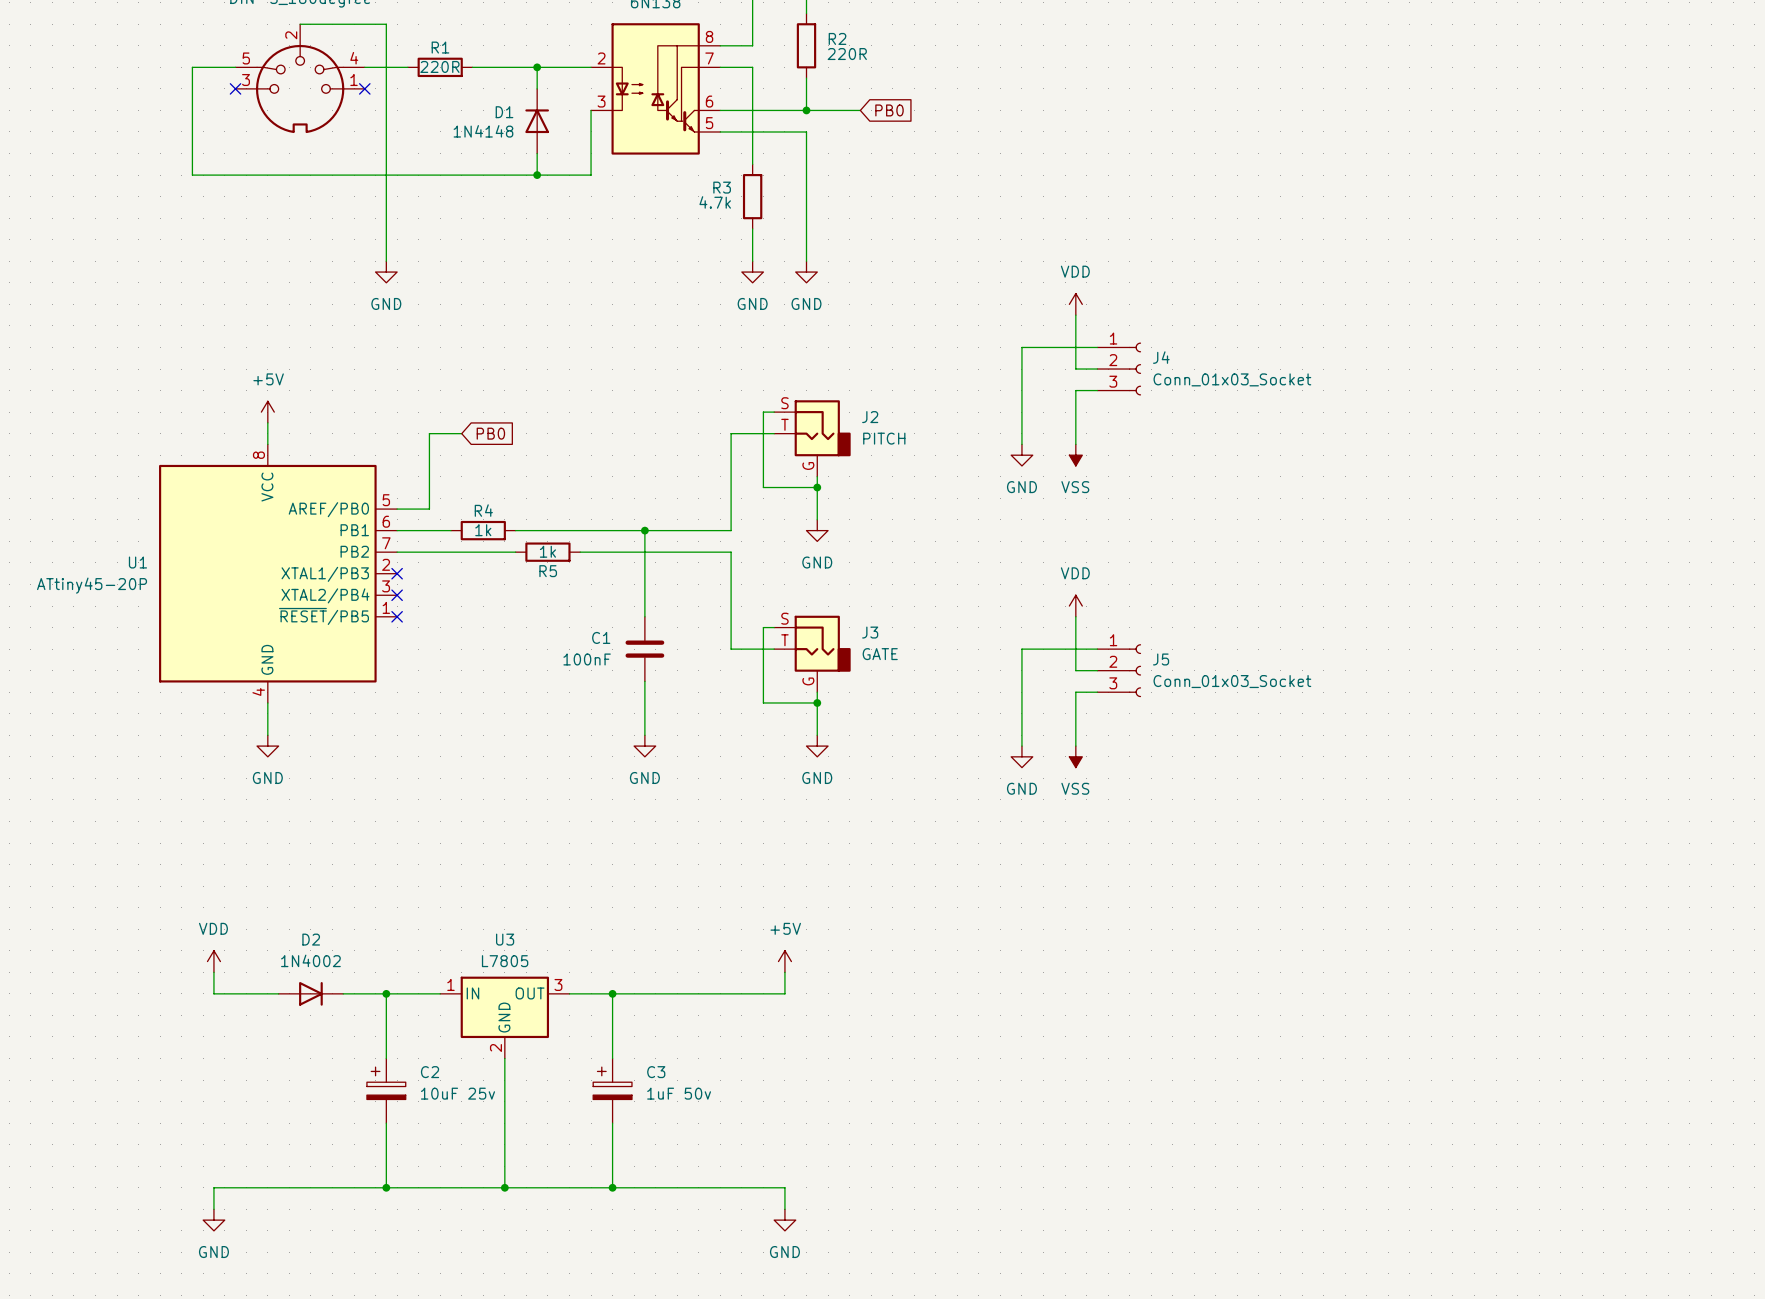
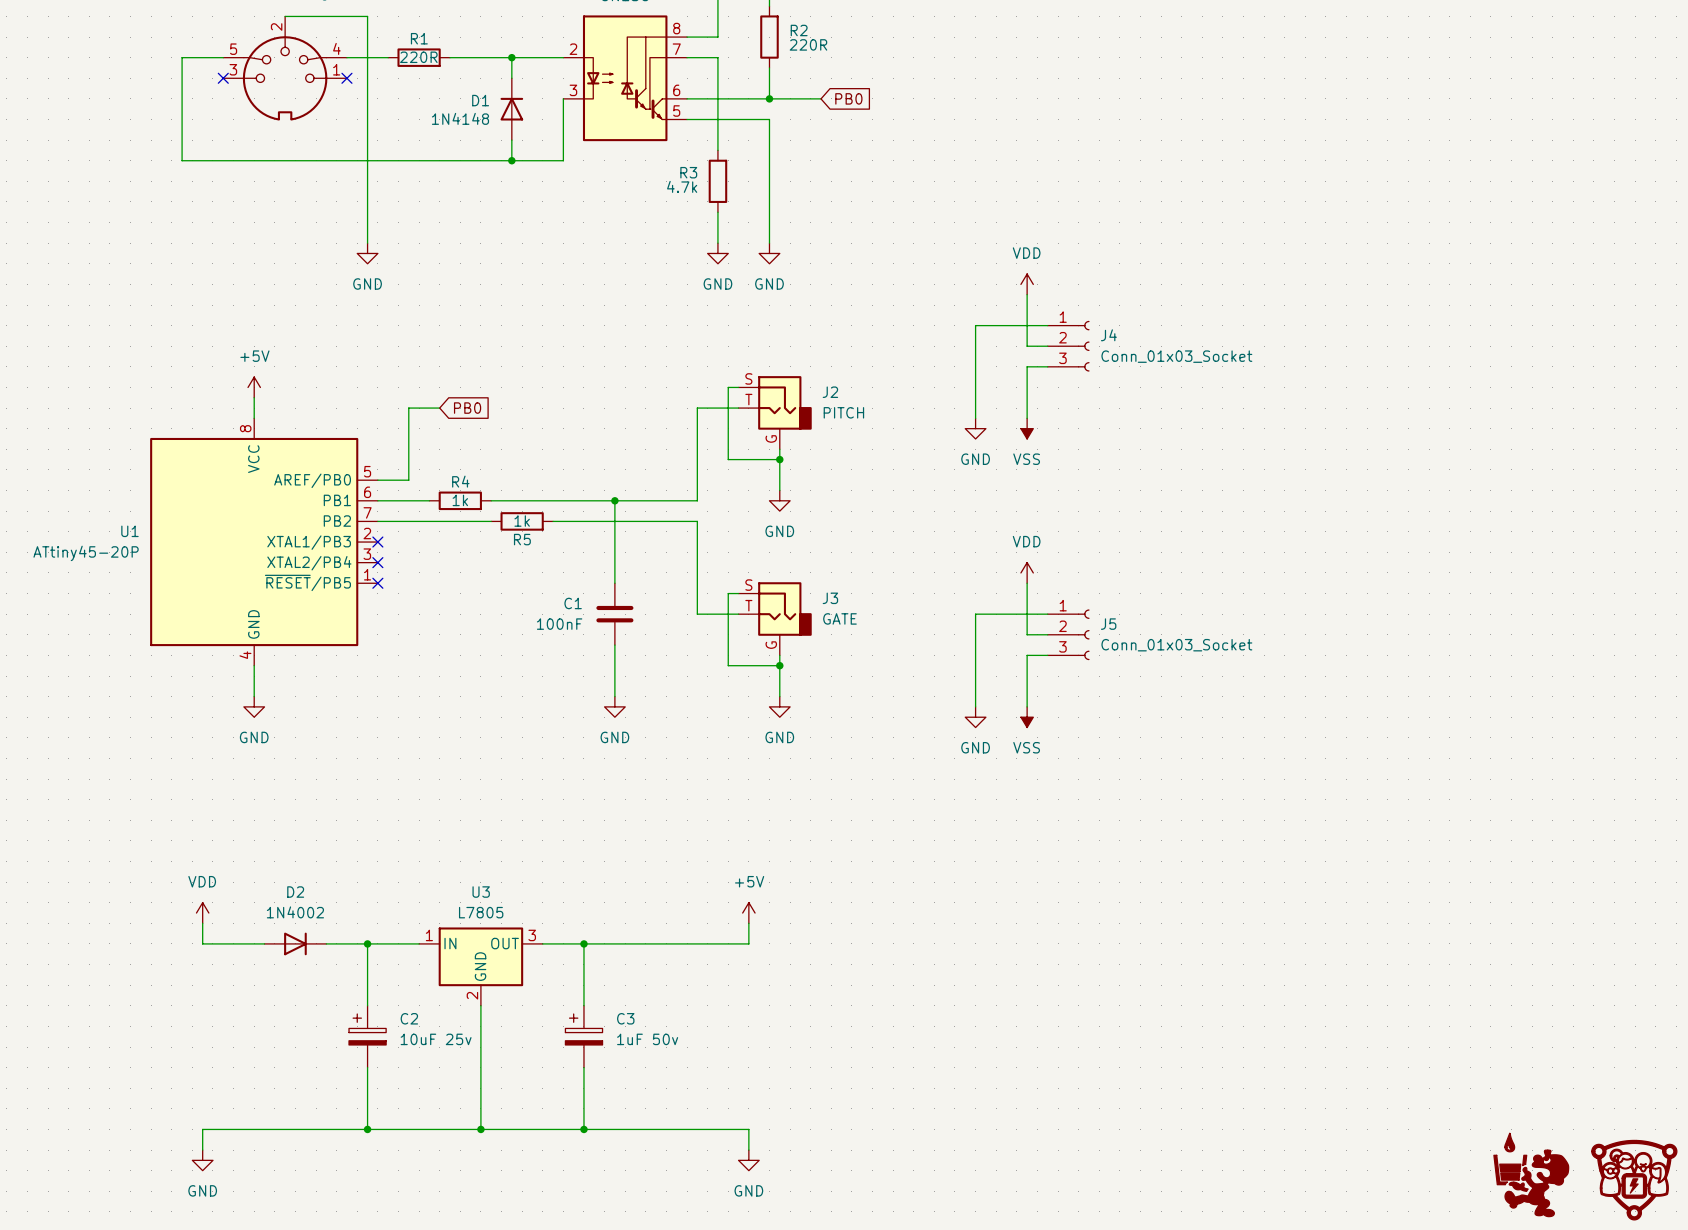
part: none -> (1531, 1175)
part: none -> (1634, 1180)

